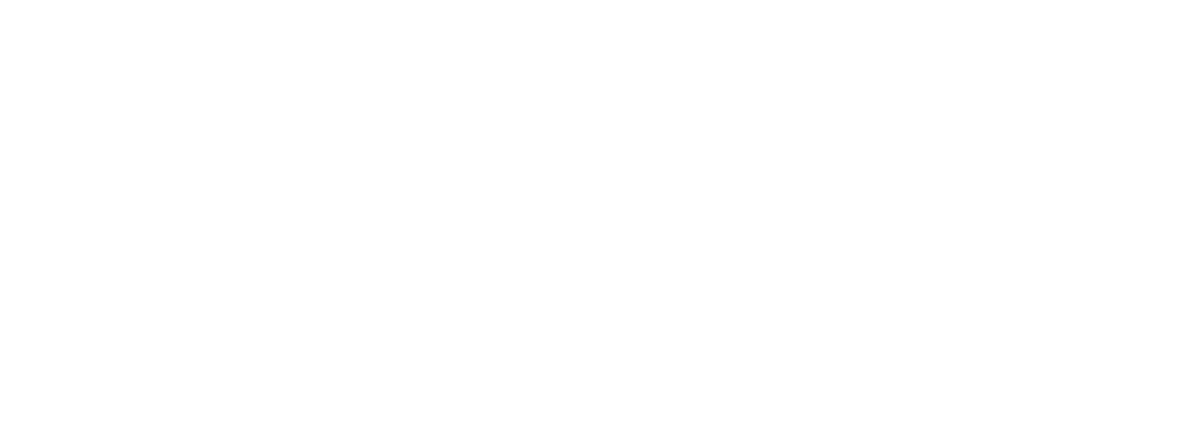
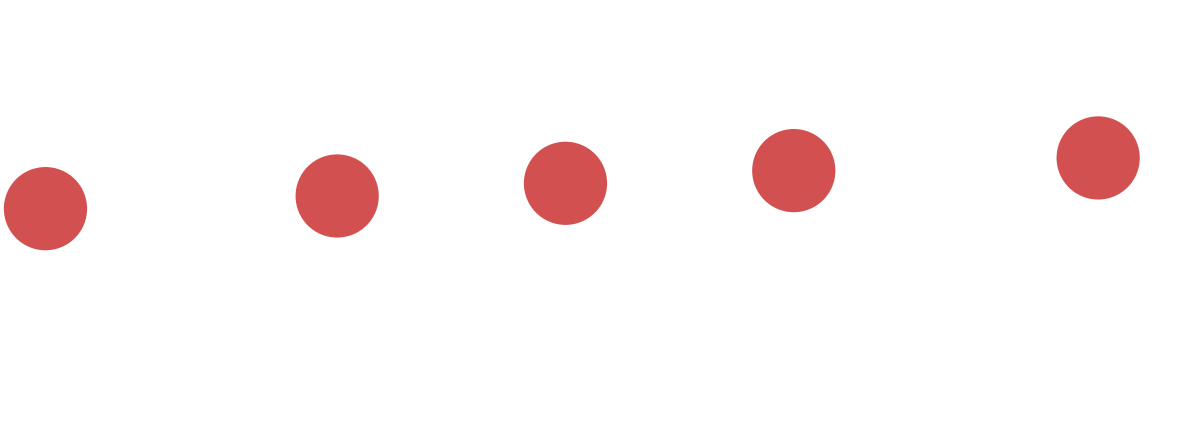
part: none -> (1098, 157)
part: none -> (793, 170)
part: none -> (565, 183)
part: none -> (337, 195)
part: none -> (45, 208)

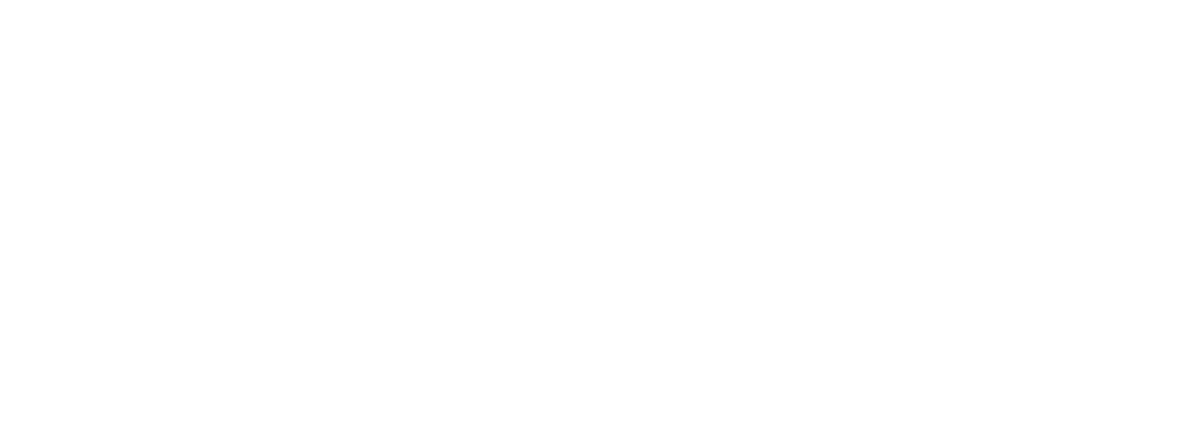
part: (1098, 157) -> none
part: (793, 170) -> none
part: (565, 183) -> none
part: (337, 195) -> none
part: (45, 208) -> none

